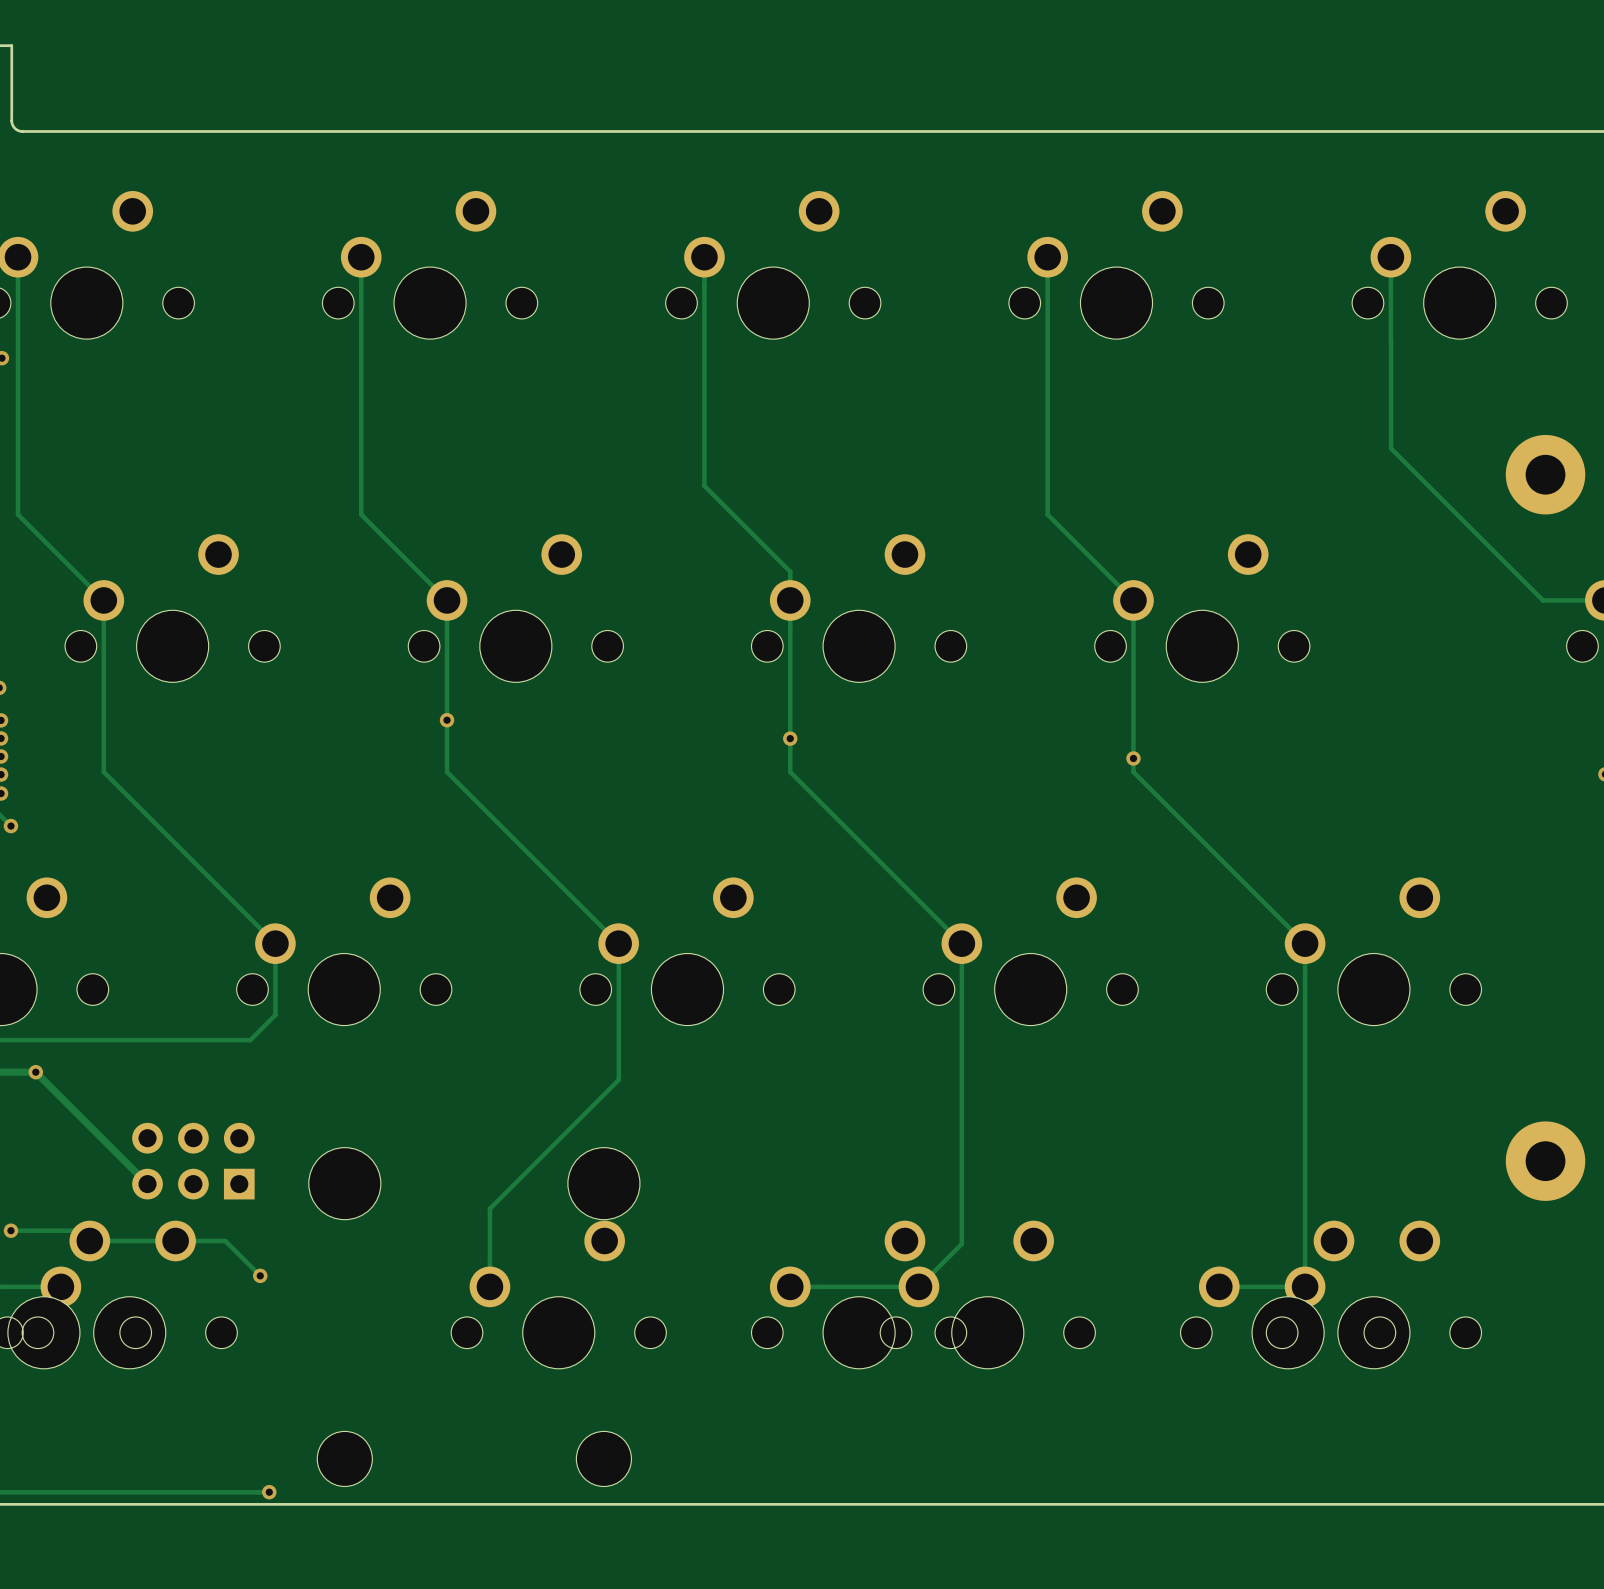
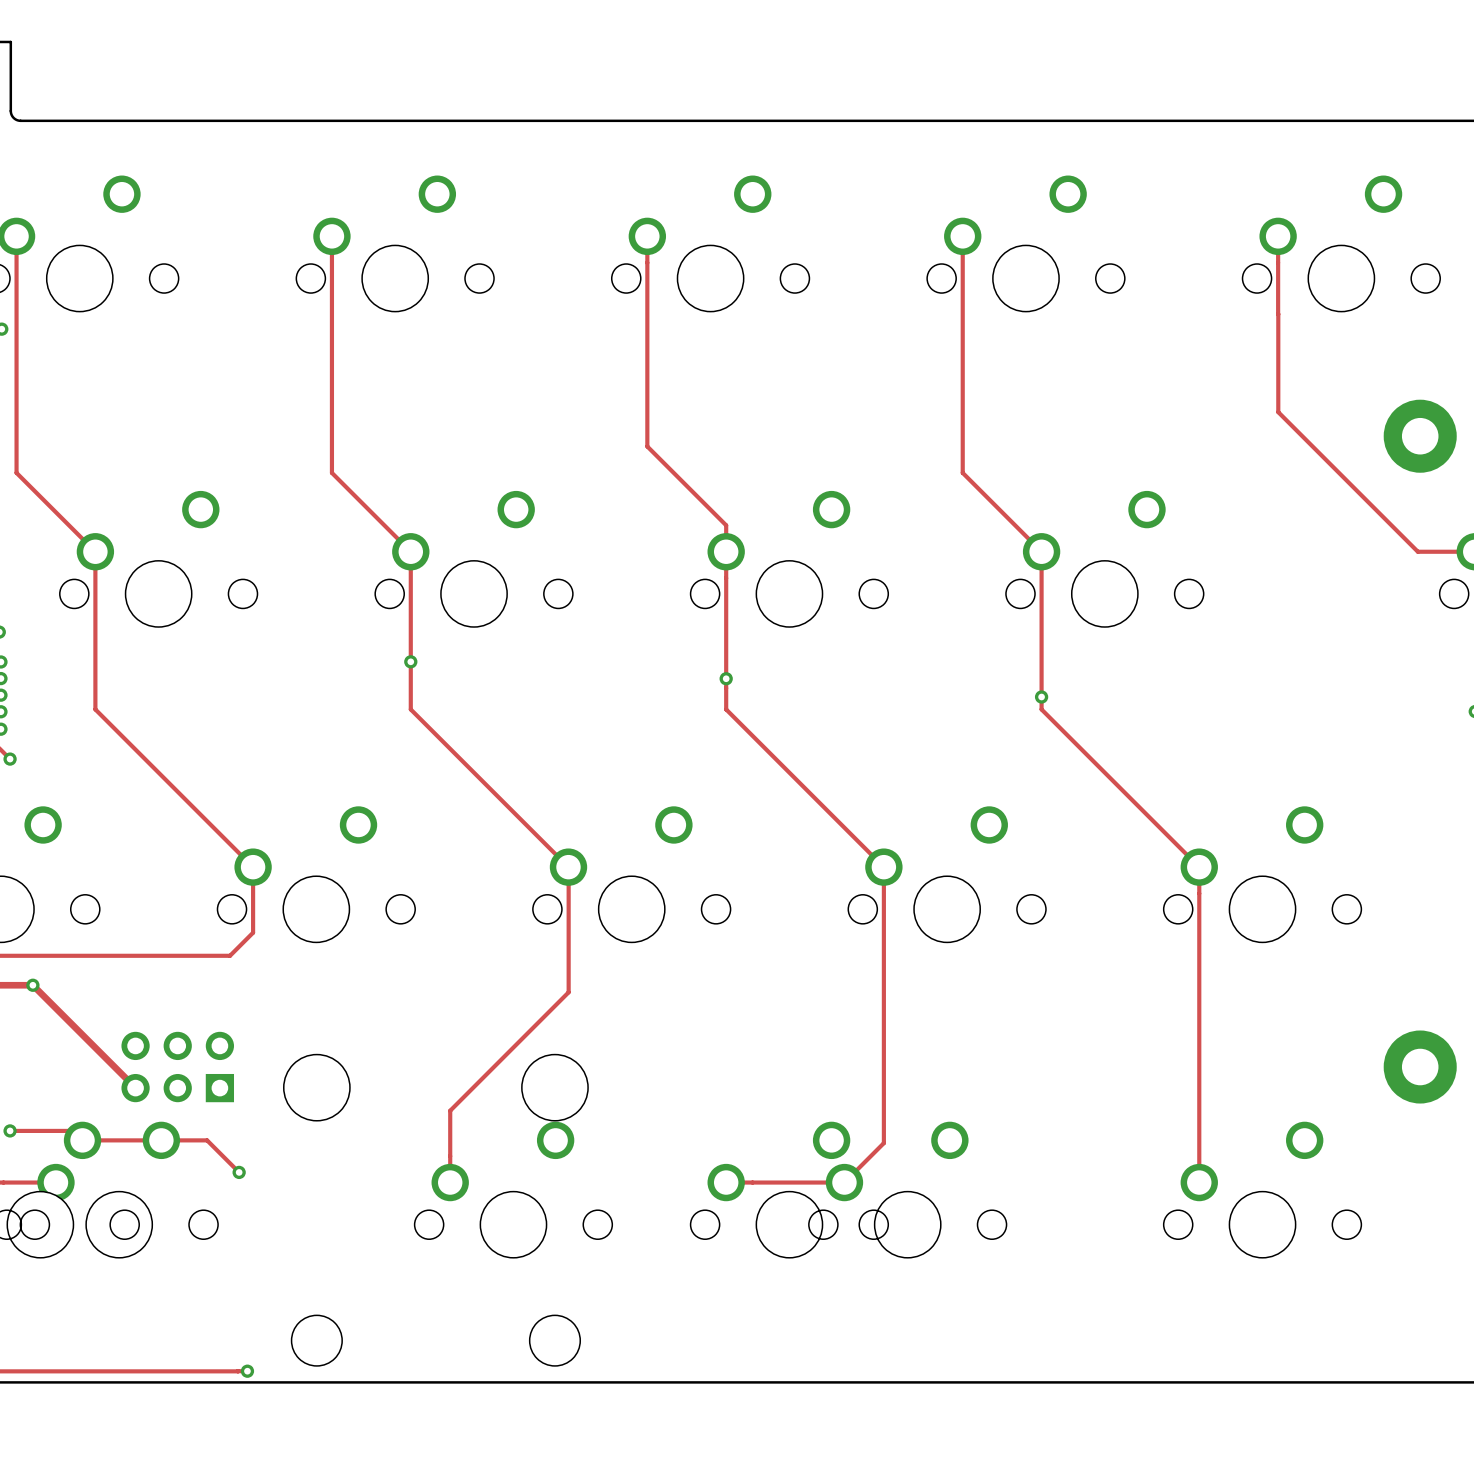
track: (1219, 1286) (1305, 1286) -> none
part: (1288, 1294) -> none

